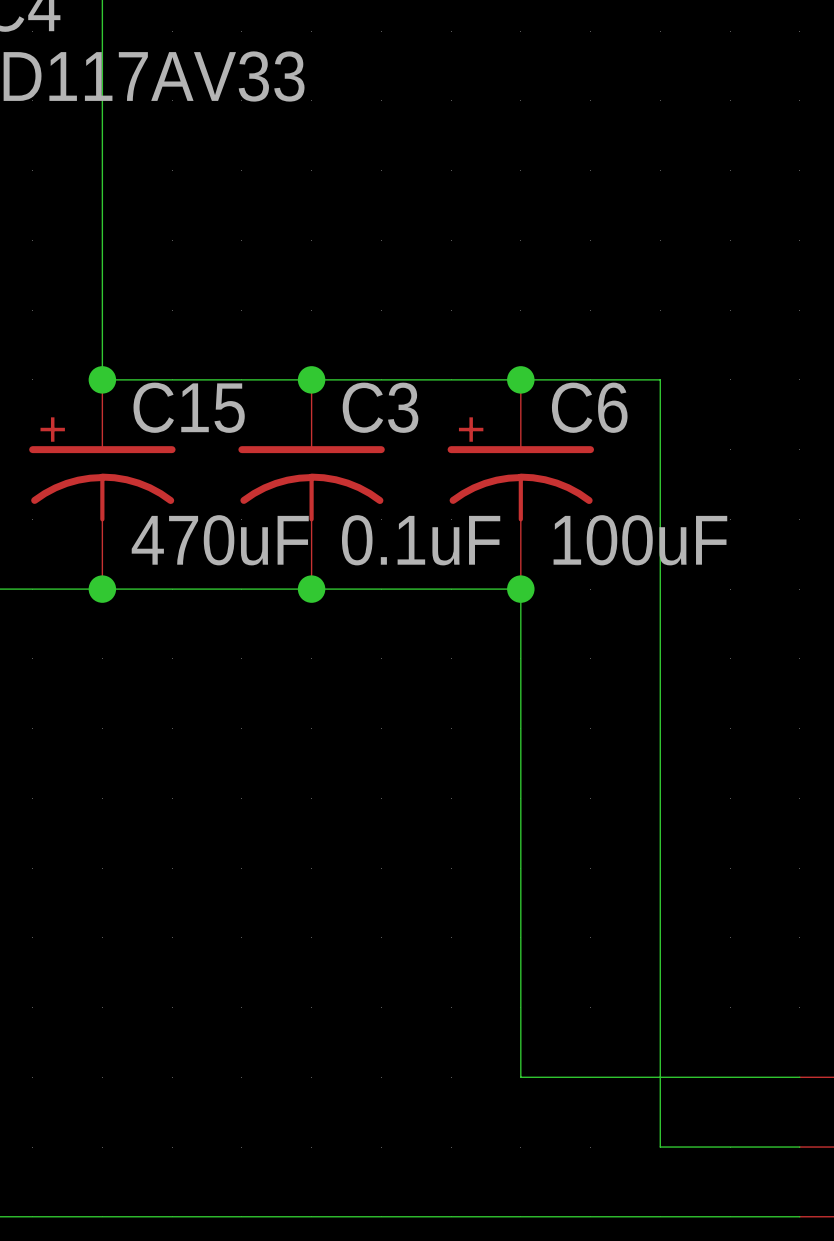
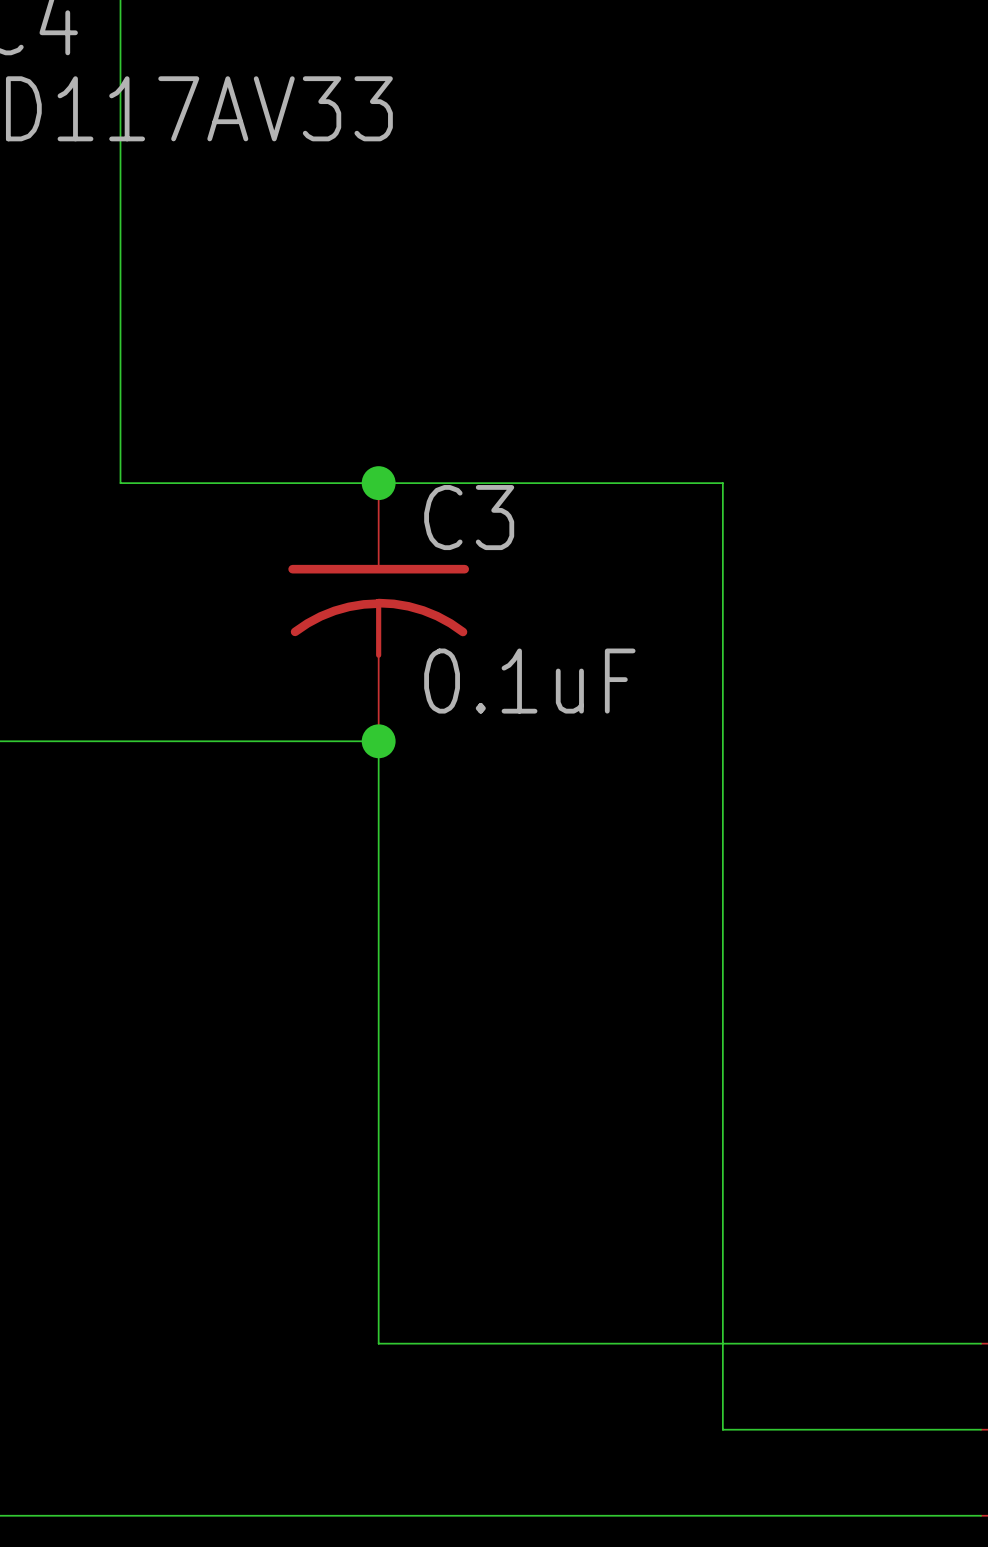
junction: (102, 379) -> none
junction: (520, 379) -> none
wire: (590, 379) (660, 379) (660, 1147) -> (722, 483) (722, 1429) (808, 1429)
C15: 470uF (102, 484) -> none
C6: 100uF (520, 484) -> none
junction: (102, 589) -> none
wire: (311, 589) (520, 589) (520, 1077) -> (378, 741) (378, 1343) (636, 1343)
junction: (520, 589) -> none

